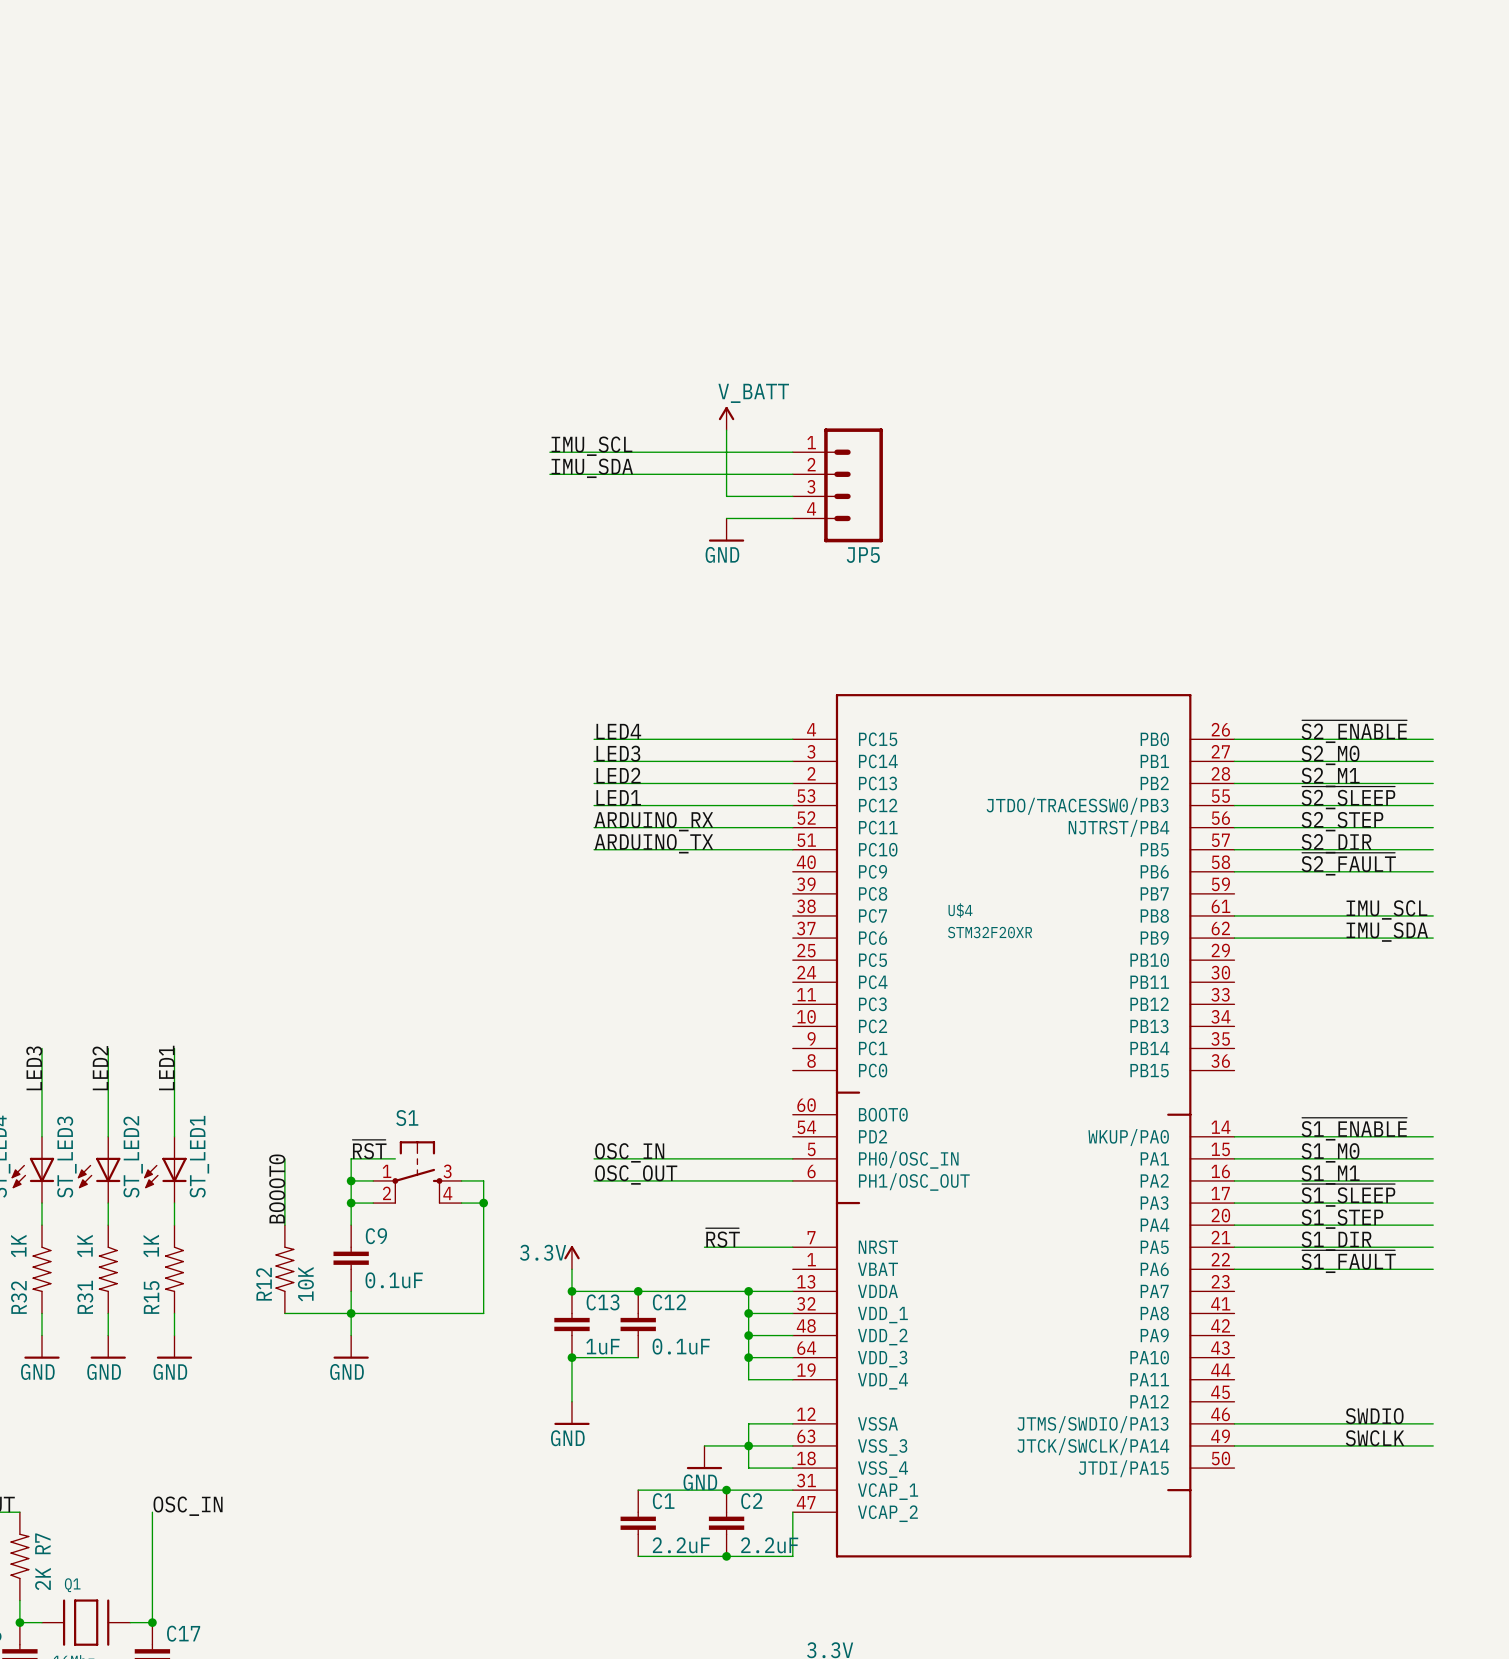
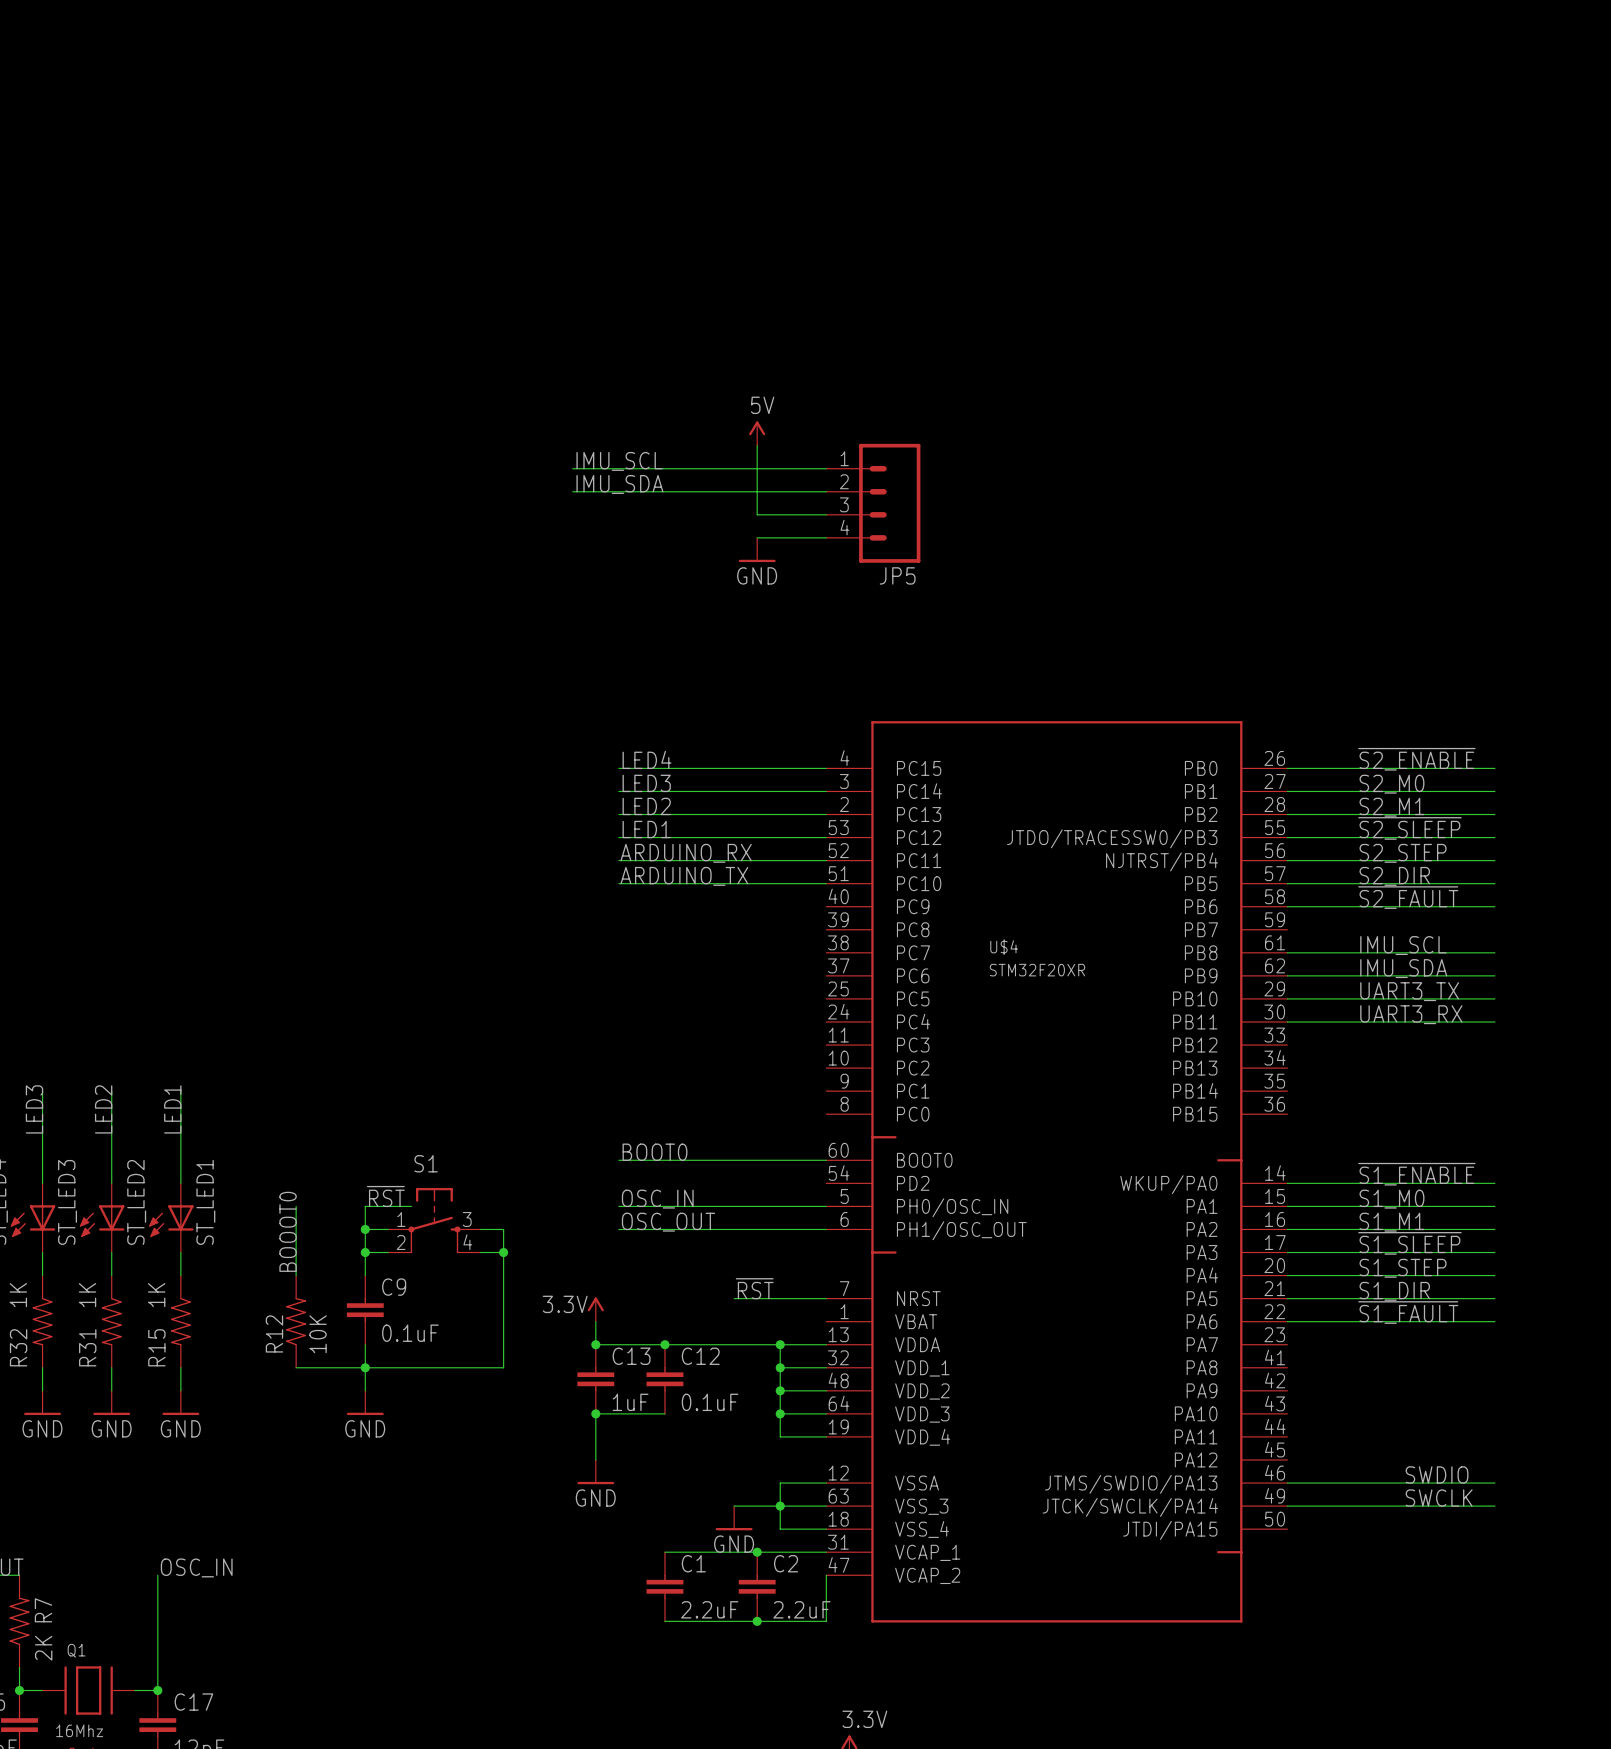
power symbol: V_BATT (726, 418) -> 5V (757, 433)
label position: IMU_SCL (1386, 909) -> IMU_SCL (1403, 945)
label position: IMU_SDA (1387, 932) -> IMU_SDA (1403, 968)
label: none -> UART3_TX (1409, 991)
wire: none -> (1287, 998) (1494, 998)
label: none -> UART3_RX (1411, 1014)
wire: none -> (1287, 1021) (1494, 1021)
label: none -> BOOT0 (654, 1152)
wire: none -> (618, 1160) (826, 1160)

